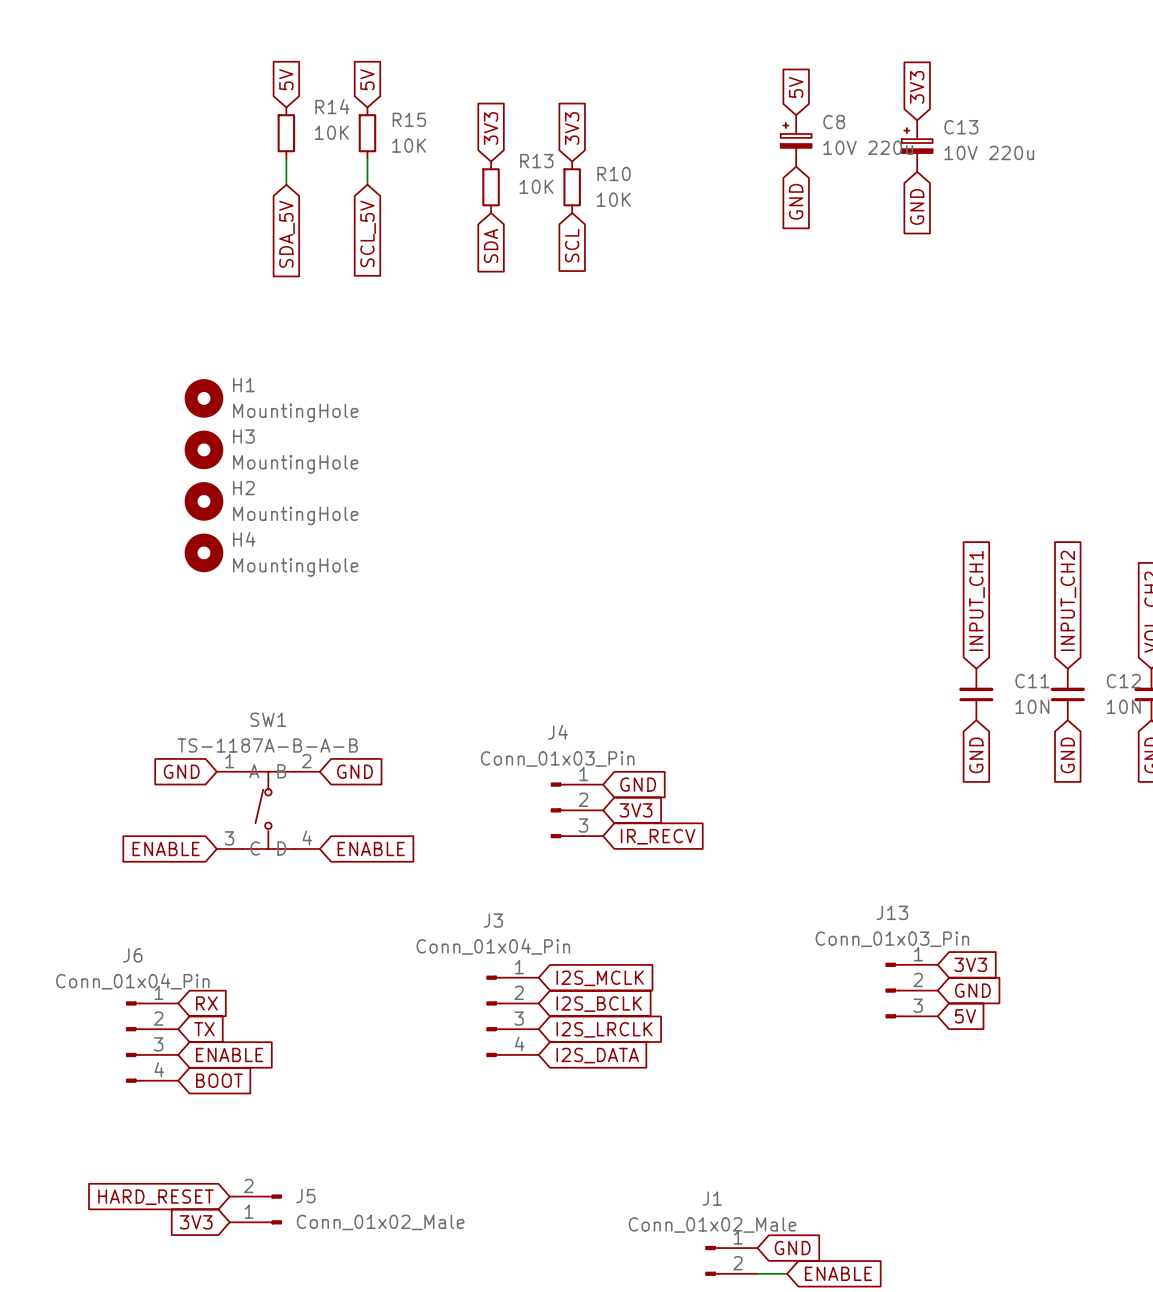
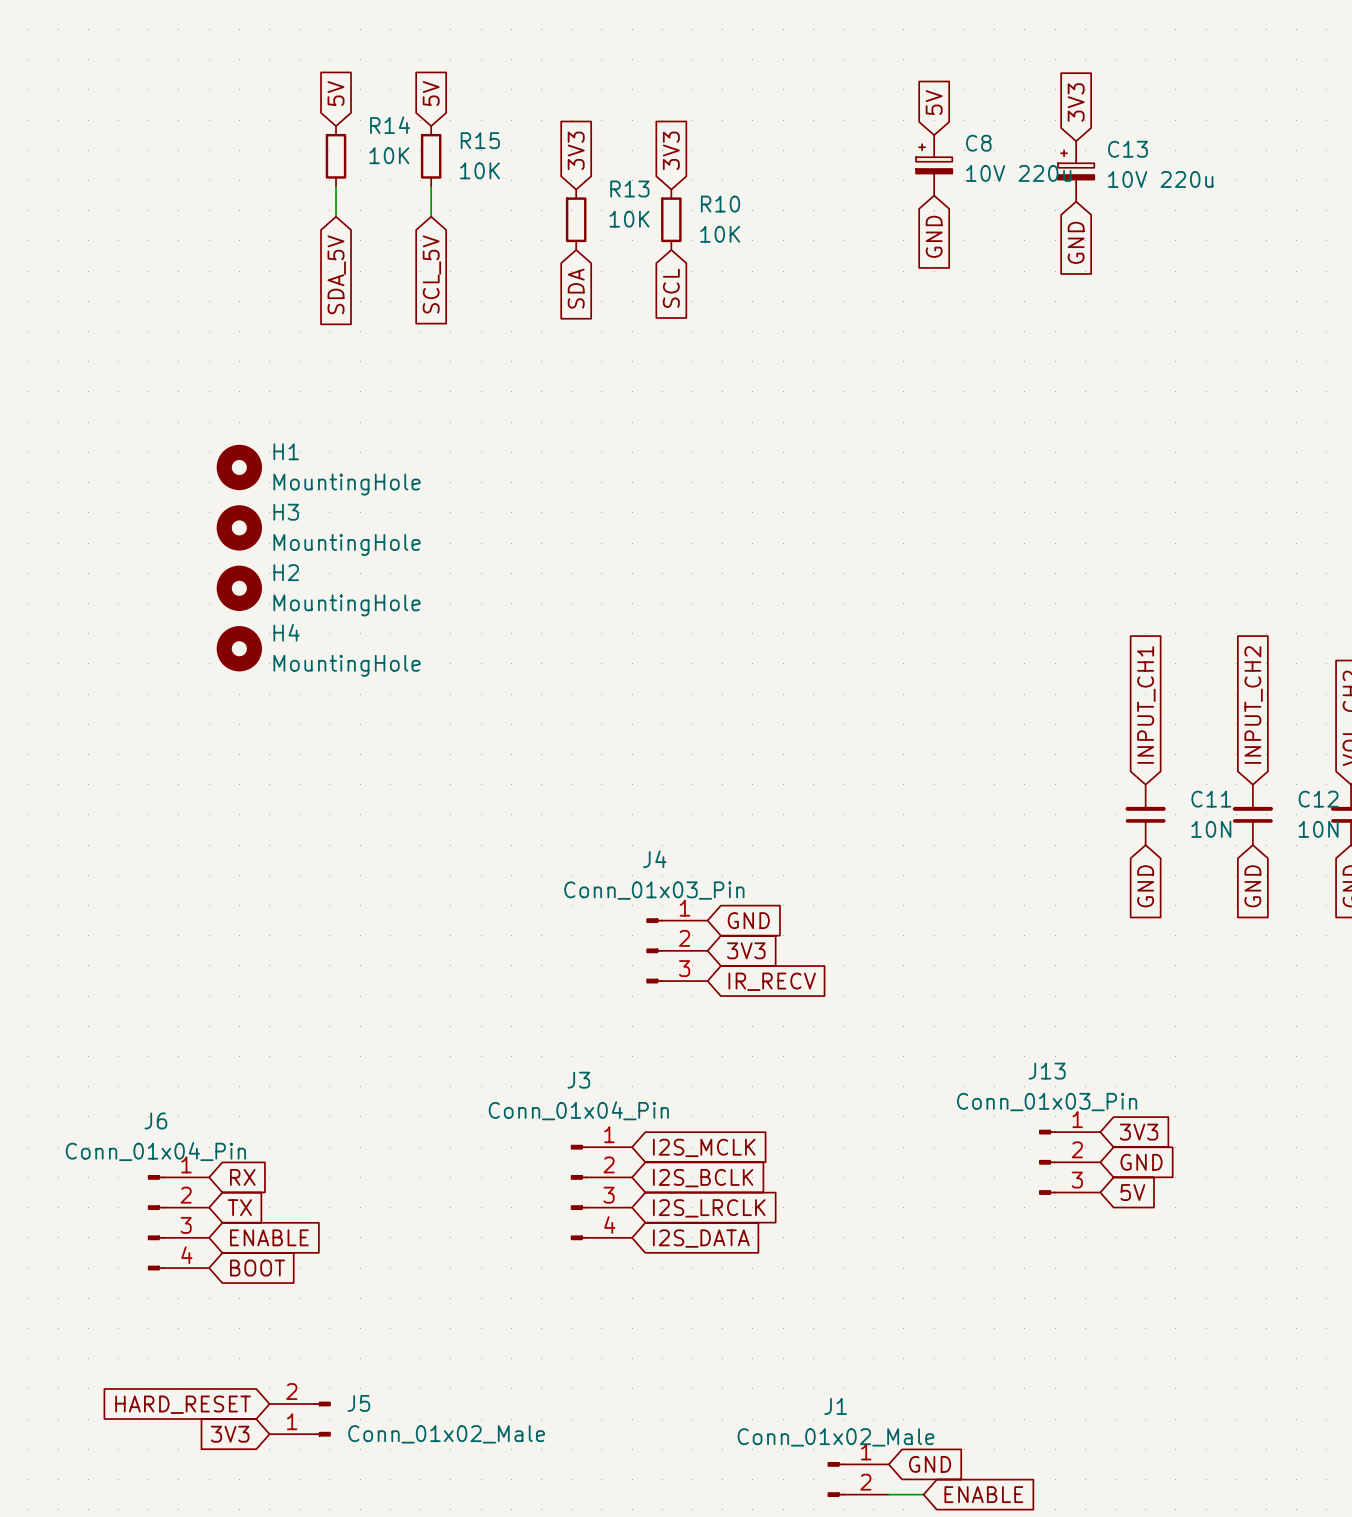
global label: GND (181, 771) -> none
global label: GND (354, 771) -> none
SW1: TS-1187A-B-A-B (268, 810) -> none
global label: ENABLE (166, 848) -> none
global label: ENABLE (371, 848) -> none

